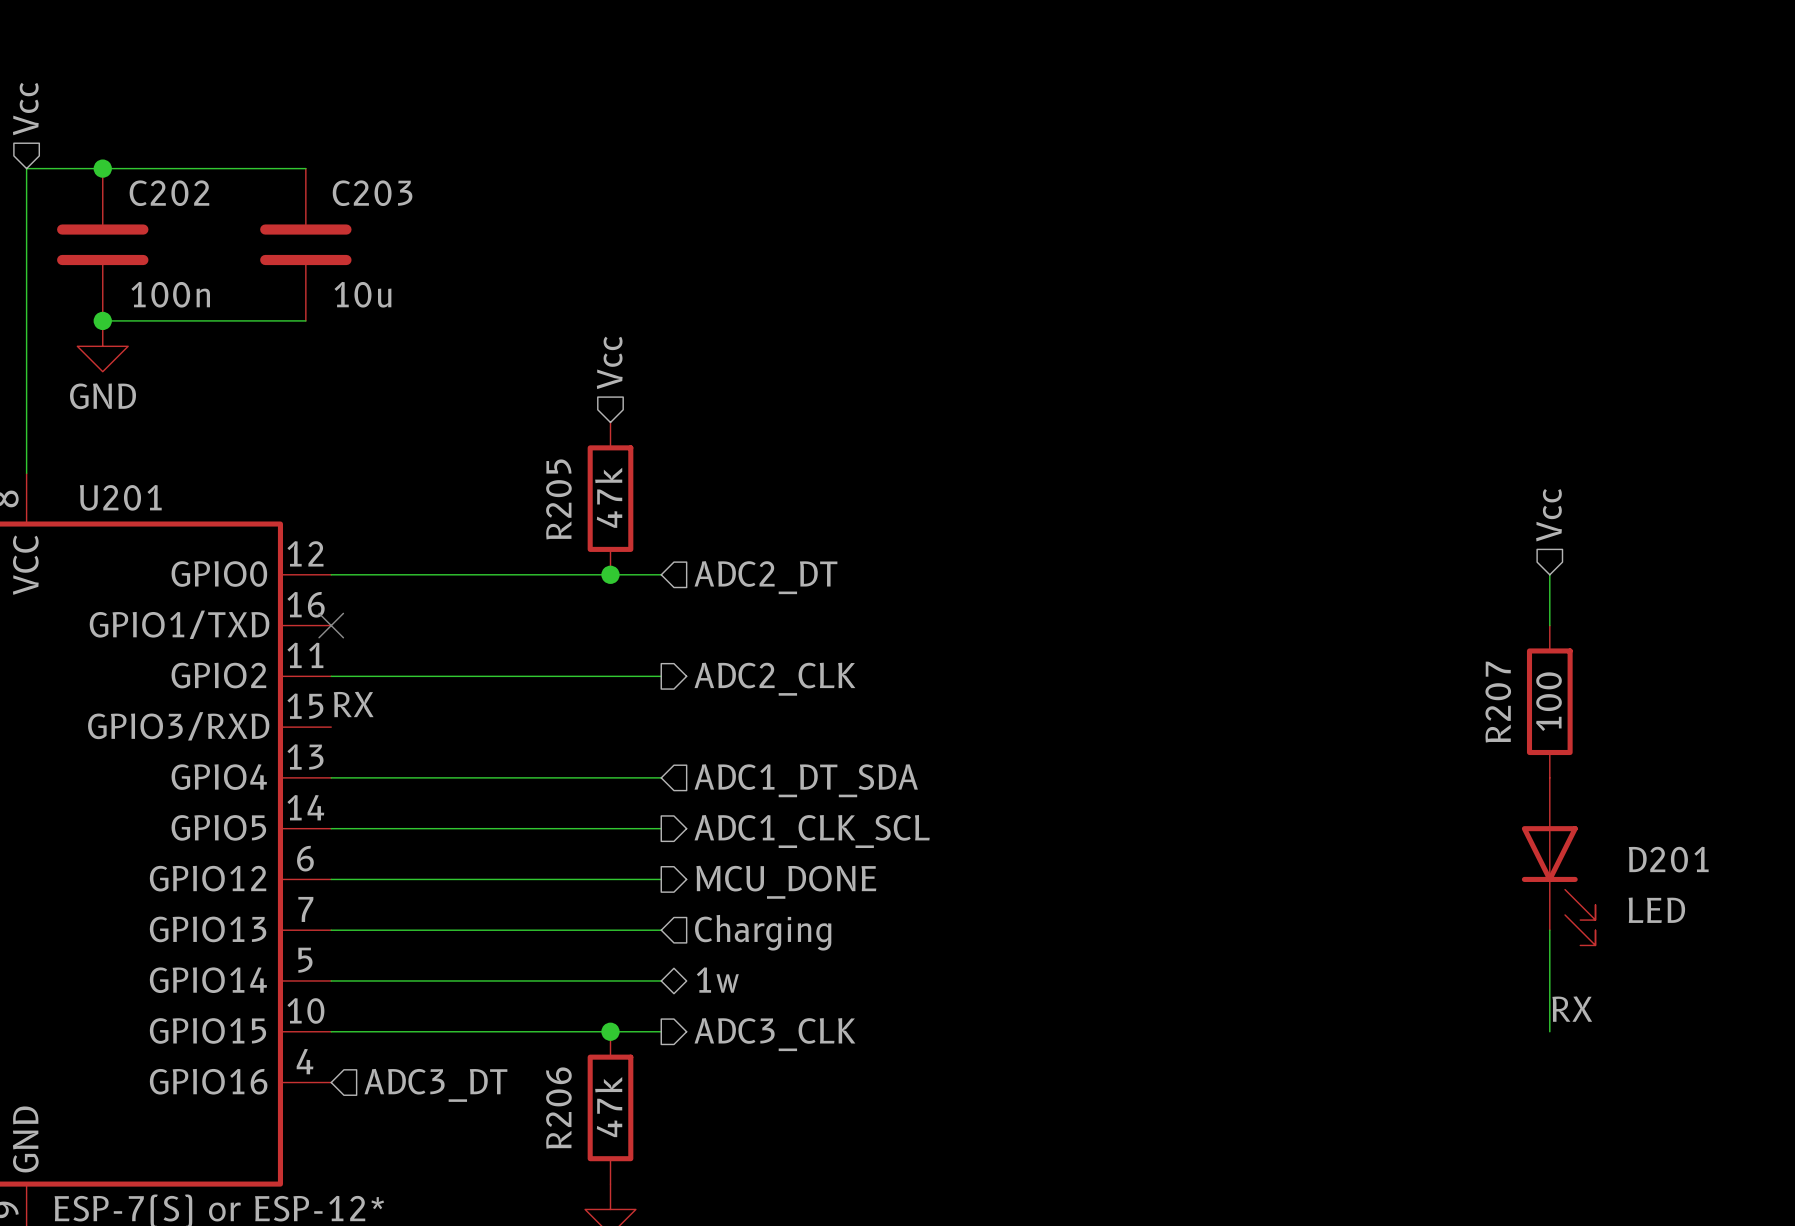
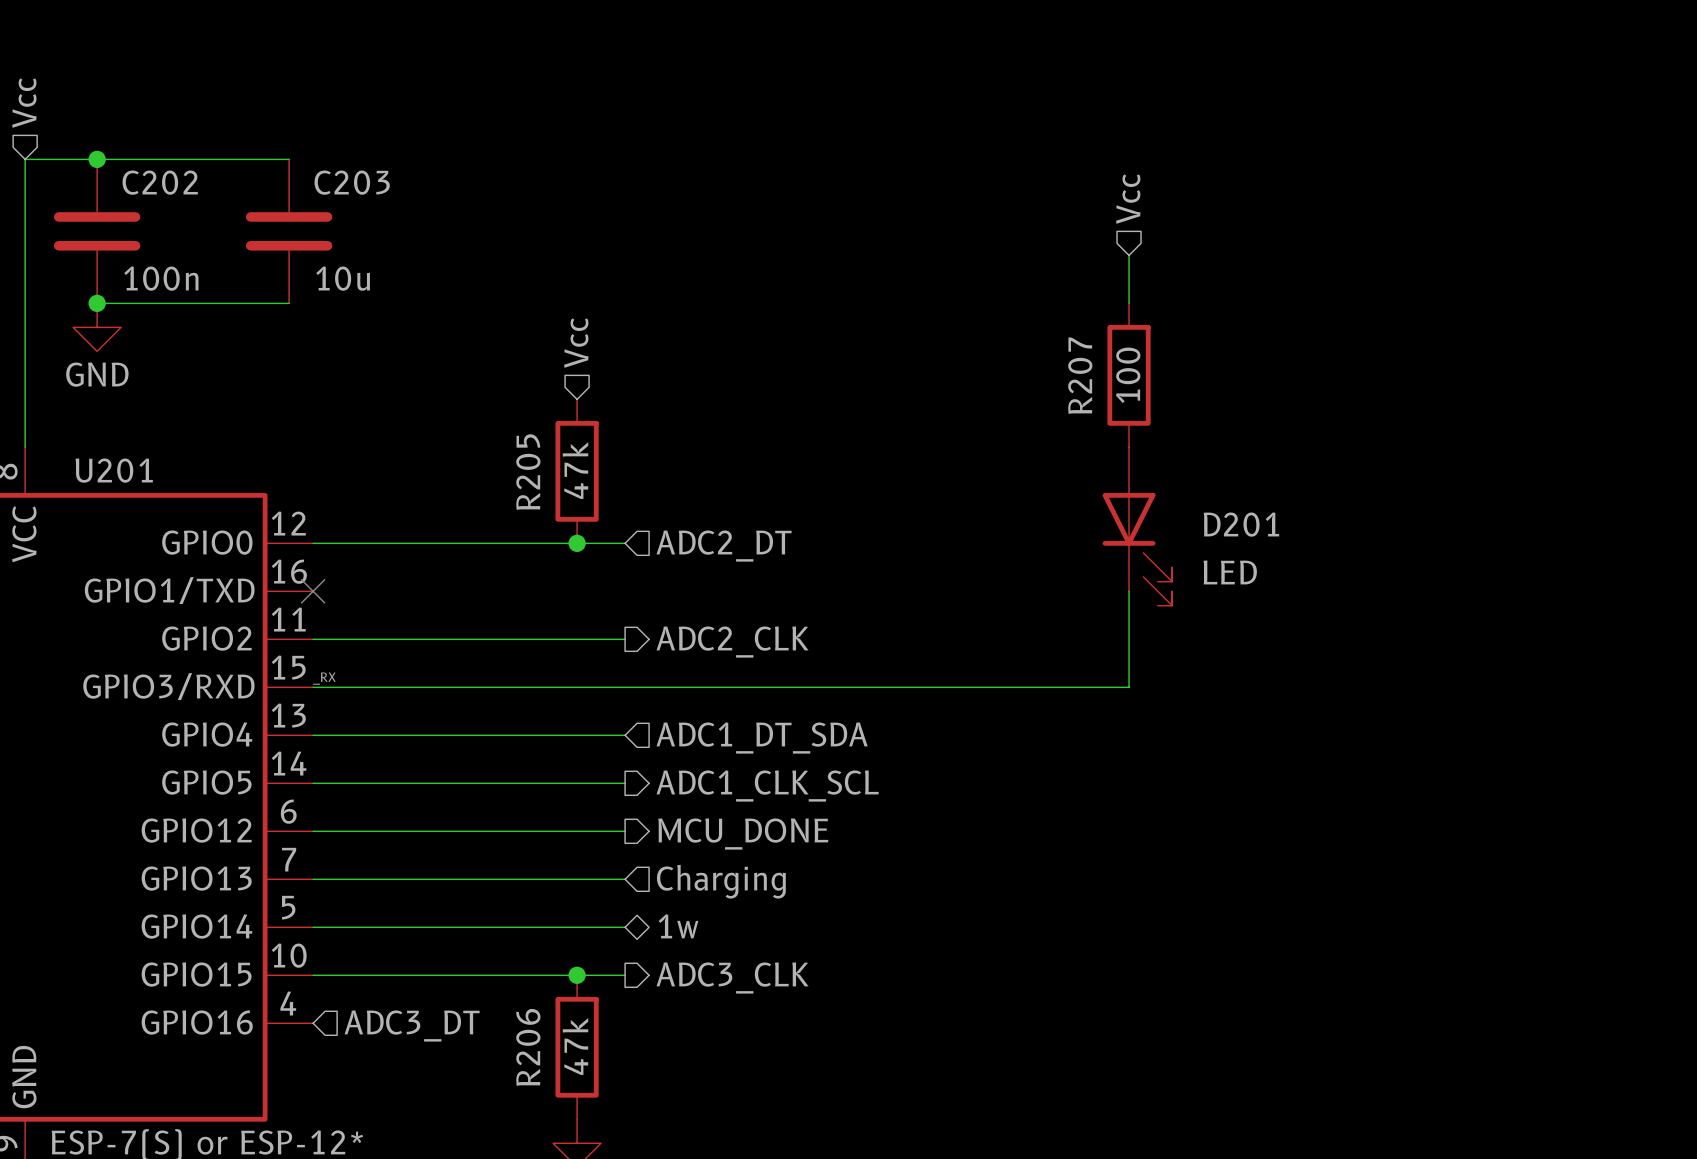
hierarchical label position: Vcc (1549, 515) -> Vcc (1128, 199)
wire: (1549, 574) (1549, 625) -> (1129, 255) (1129, 303)
wire: none -> (1129, 591) (1129, 687) (313, 687)
R207 position: (1549, 701) -> (1129, 375)
label: RX (353, 704) -> _RX (324, 678)
D201 position: (1558, 861) -> (1137, 526)
wire: (1549, 930) (1549, 1031) -> none
label: RX (1572, 1009) -> none

